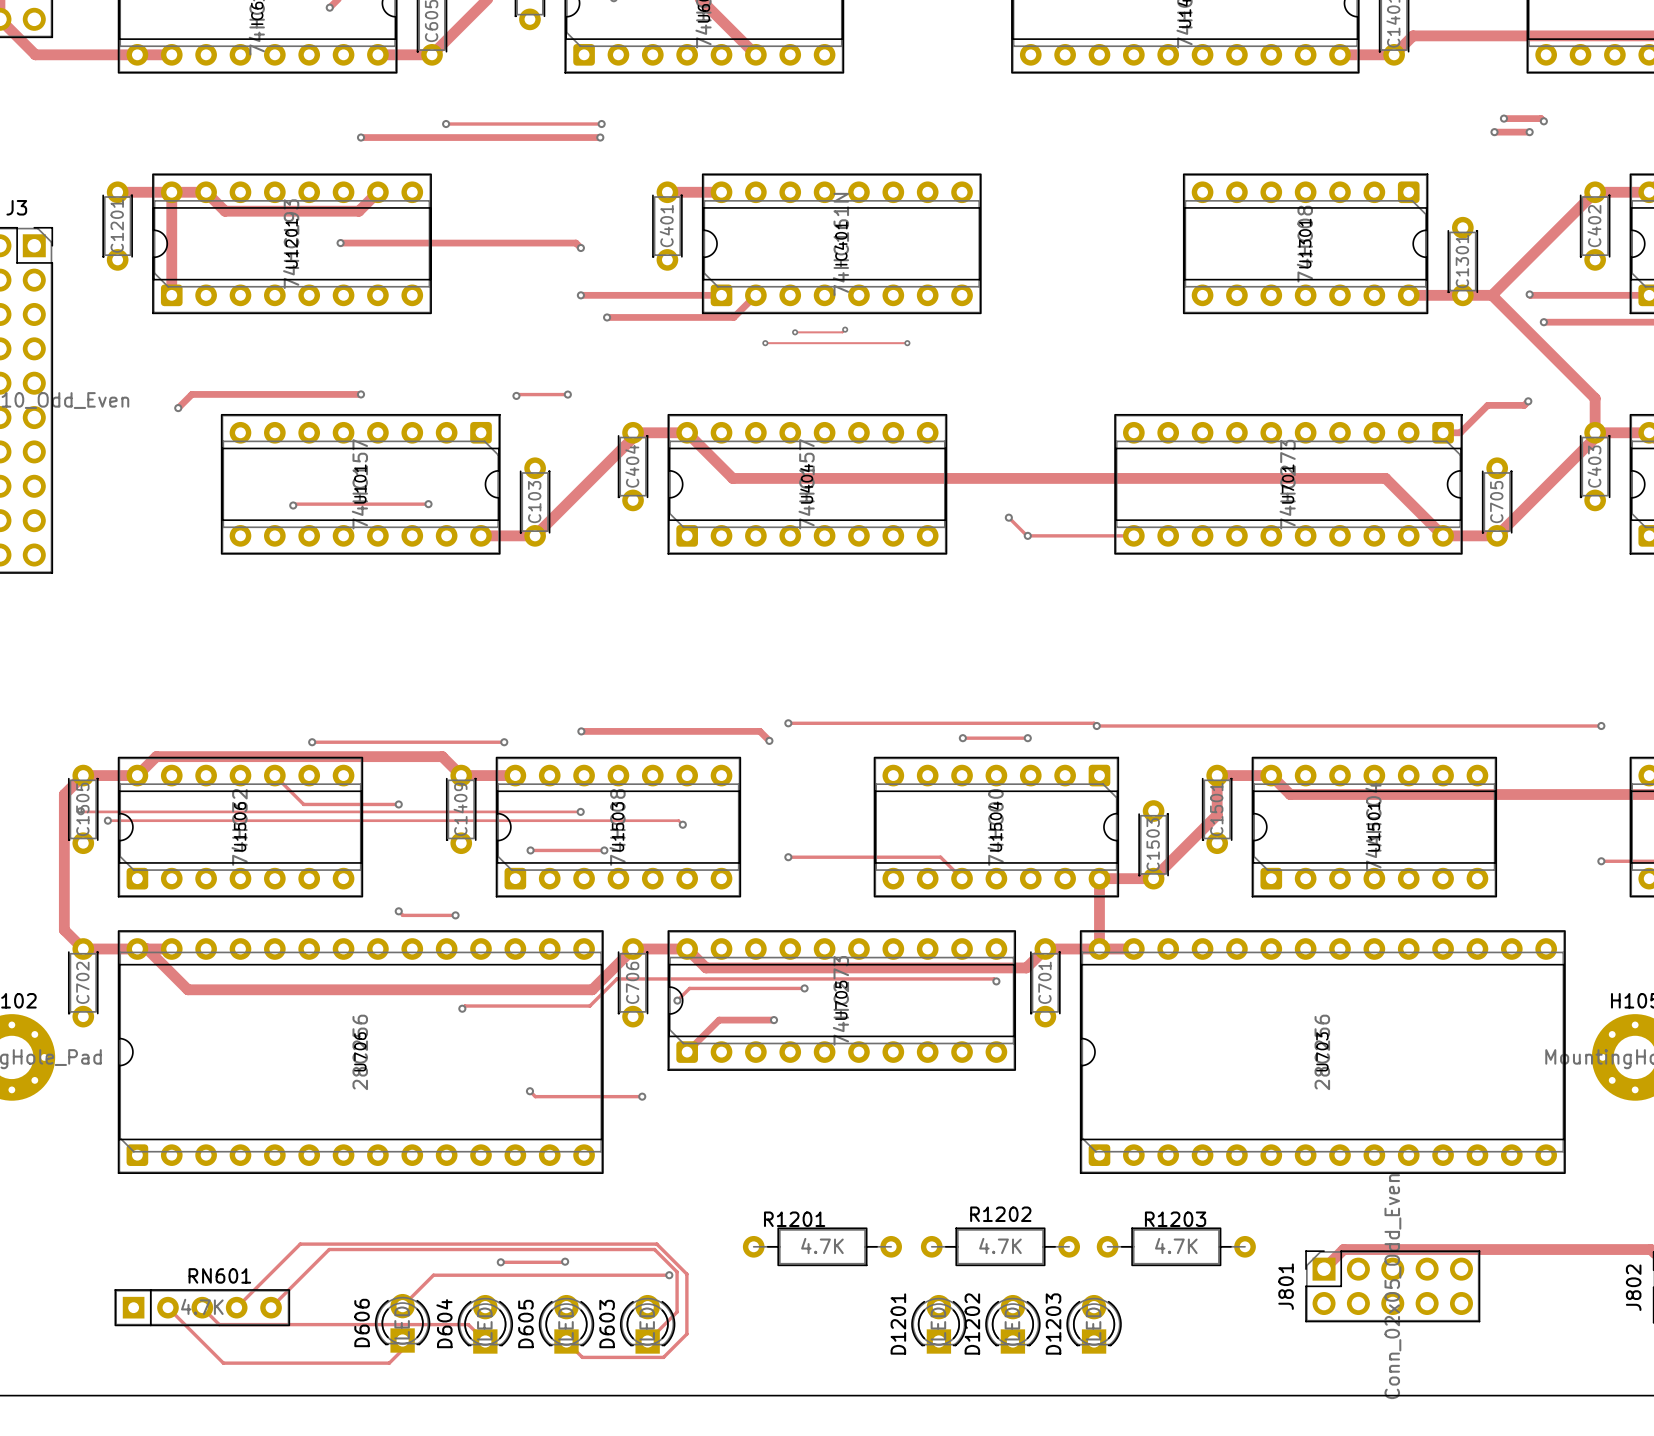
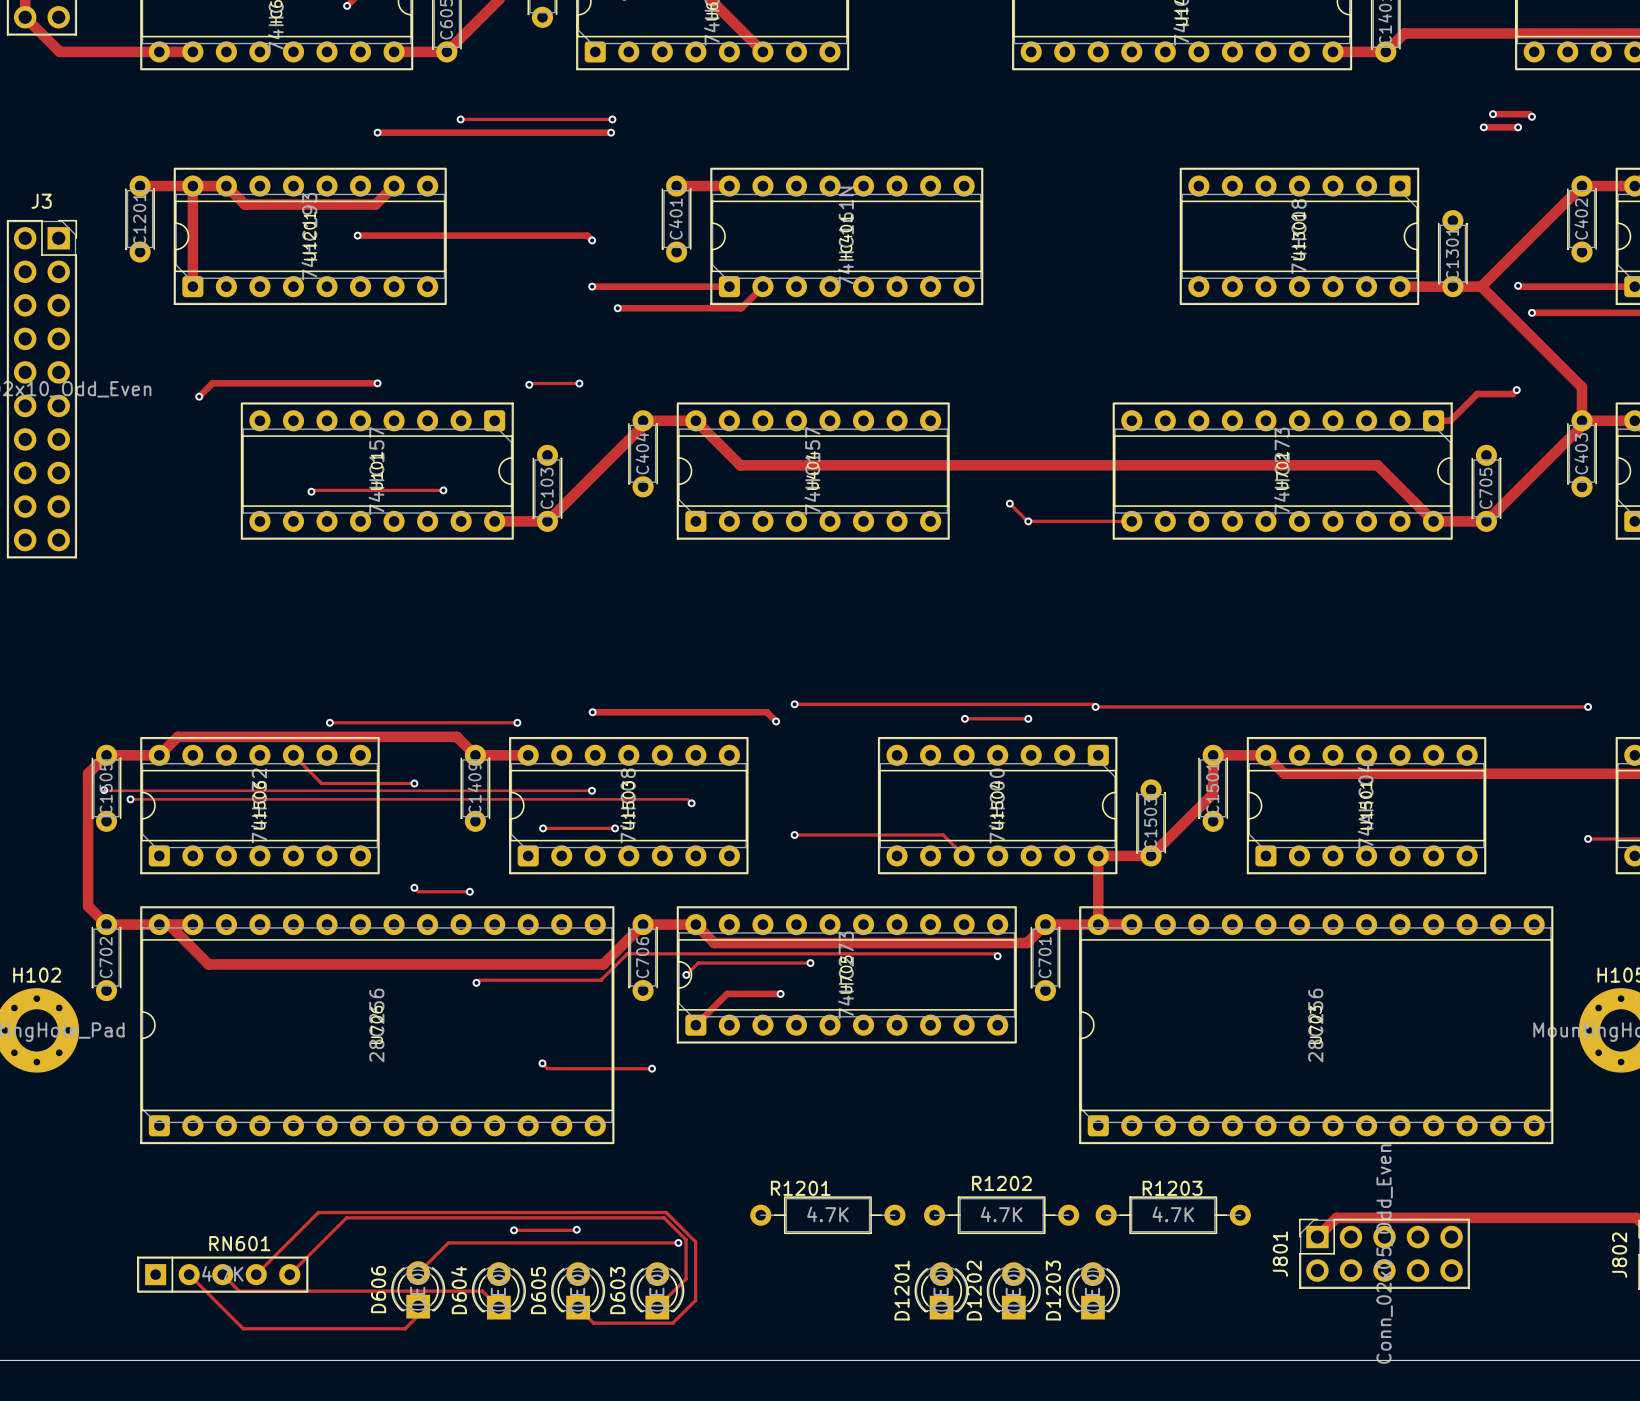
track: (845, 329) (842, 332) (795, 332) -> none
via: (845, 329) -> none
via: (795, 332) -> none
track: (765, 343) (907, 343) -> none
via: (765, 343) -> none
via: (907, 343) -> none

